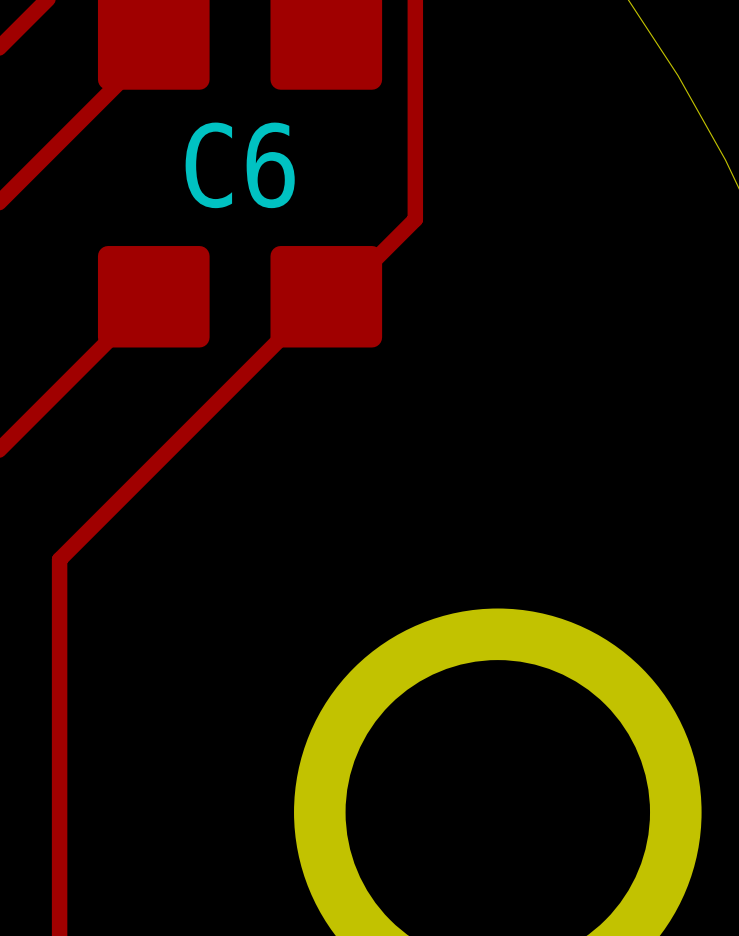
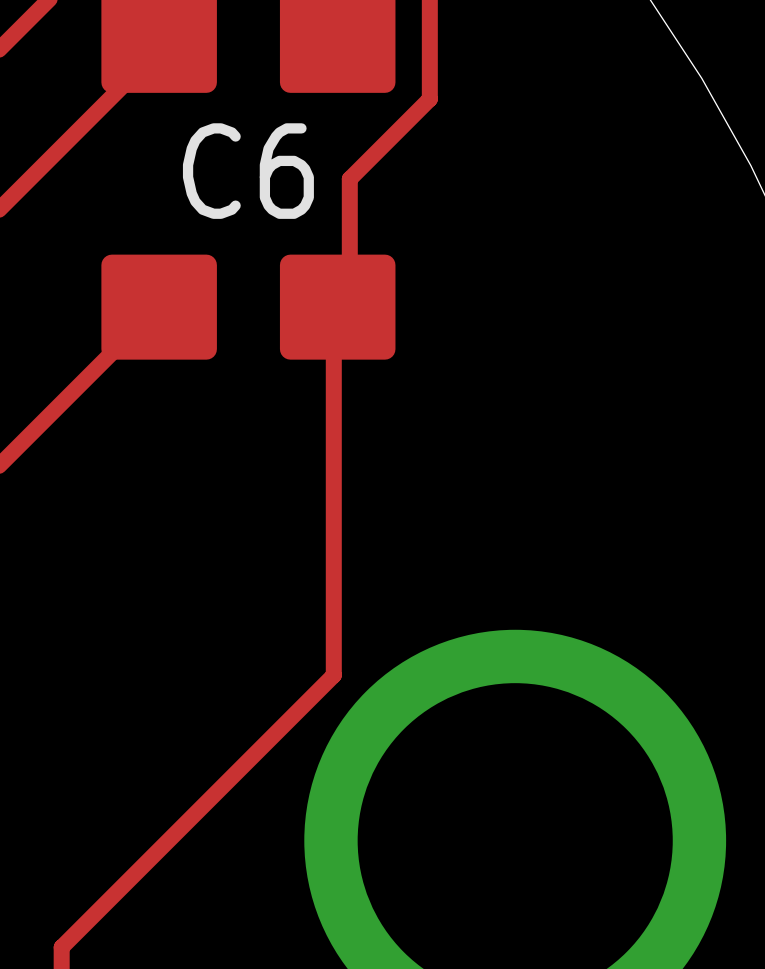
top track: (415, 95) (415, 219) (337, 296) -> (429, 99) (349, 179) (349, 307)
top track: (322, 296) (59, 559) (59, 915) -> (333, 307) (333, 675) (61, 947)

